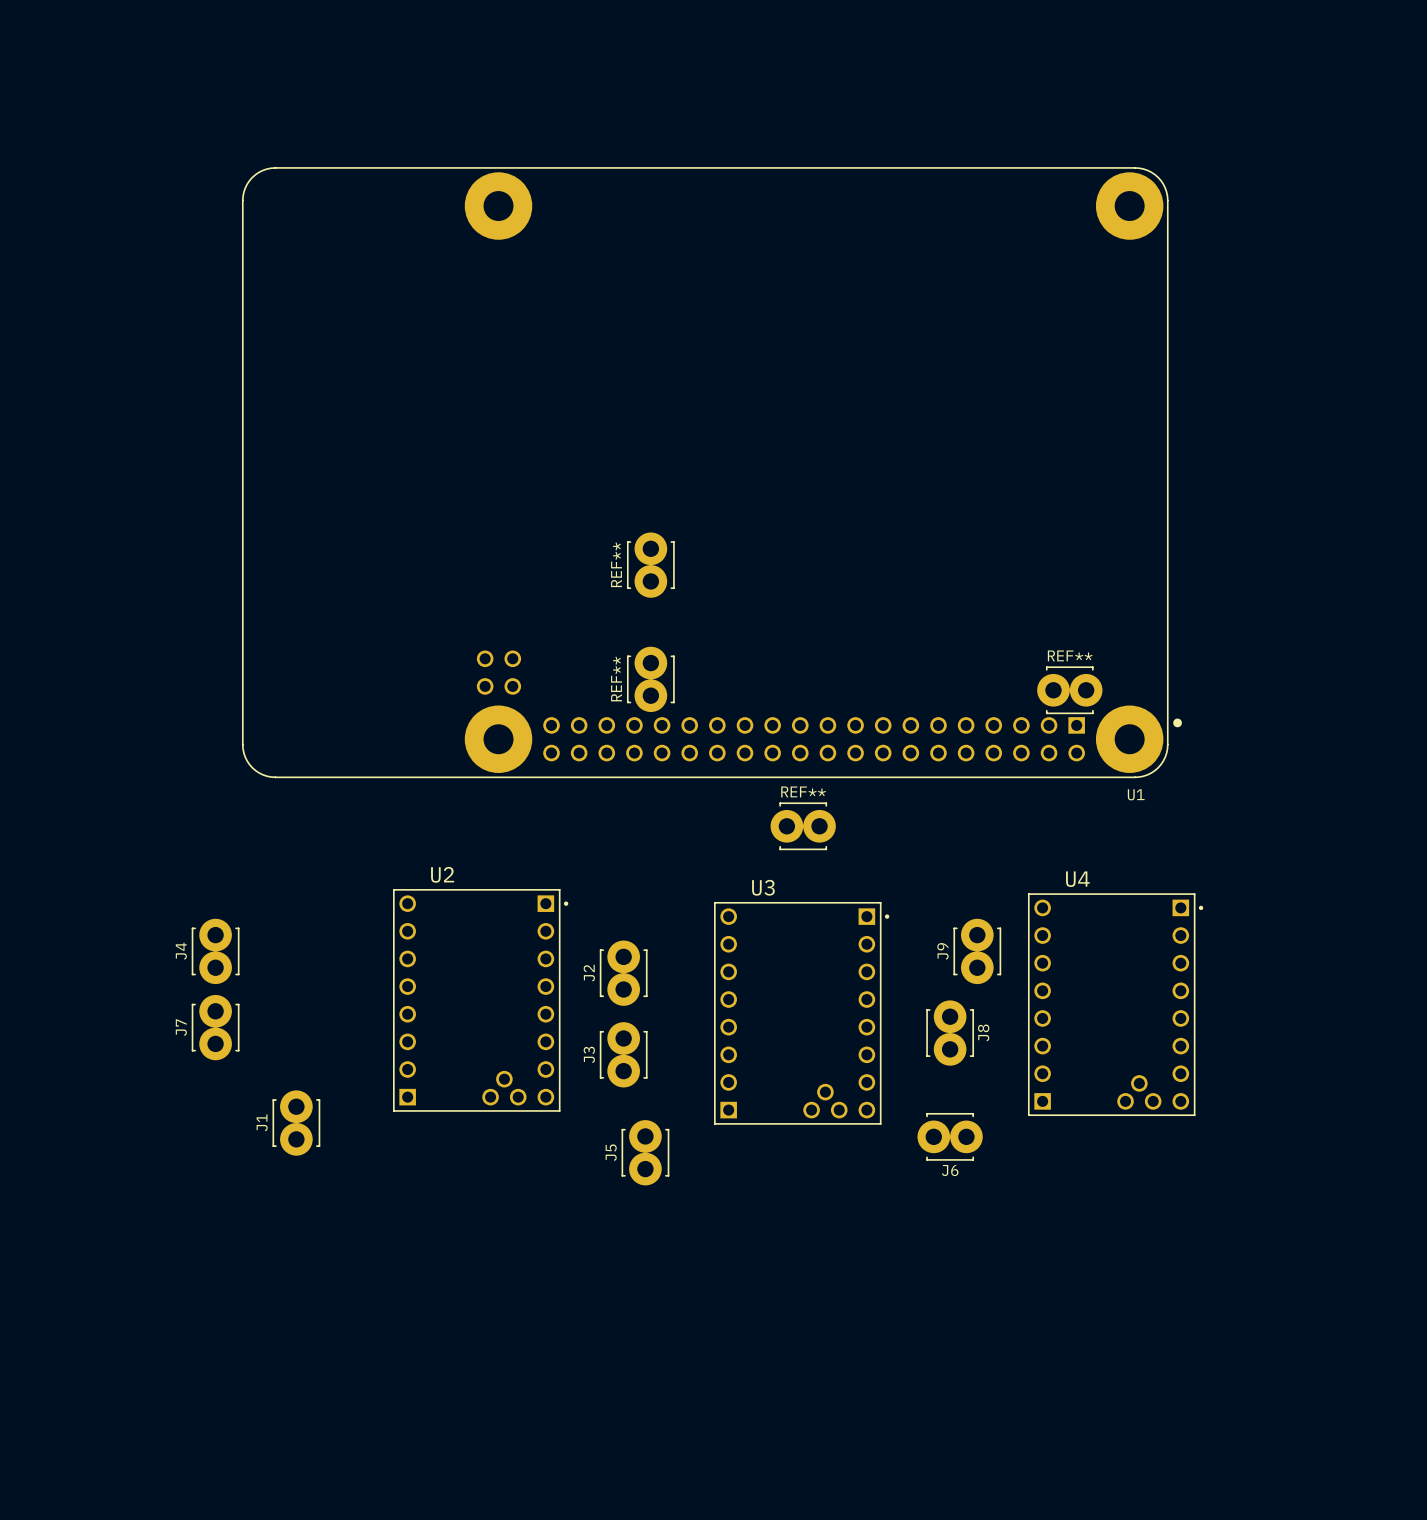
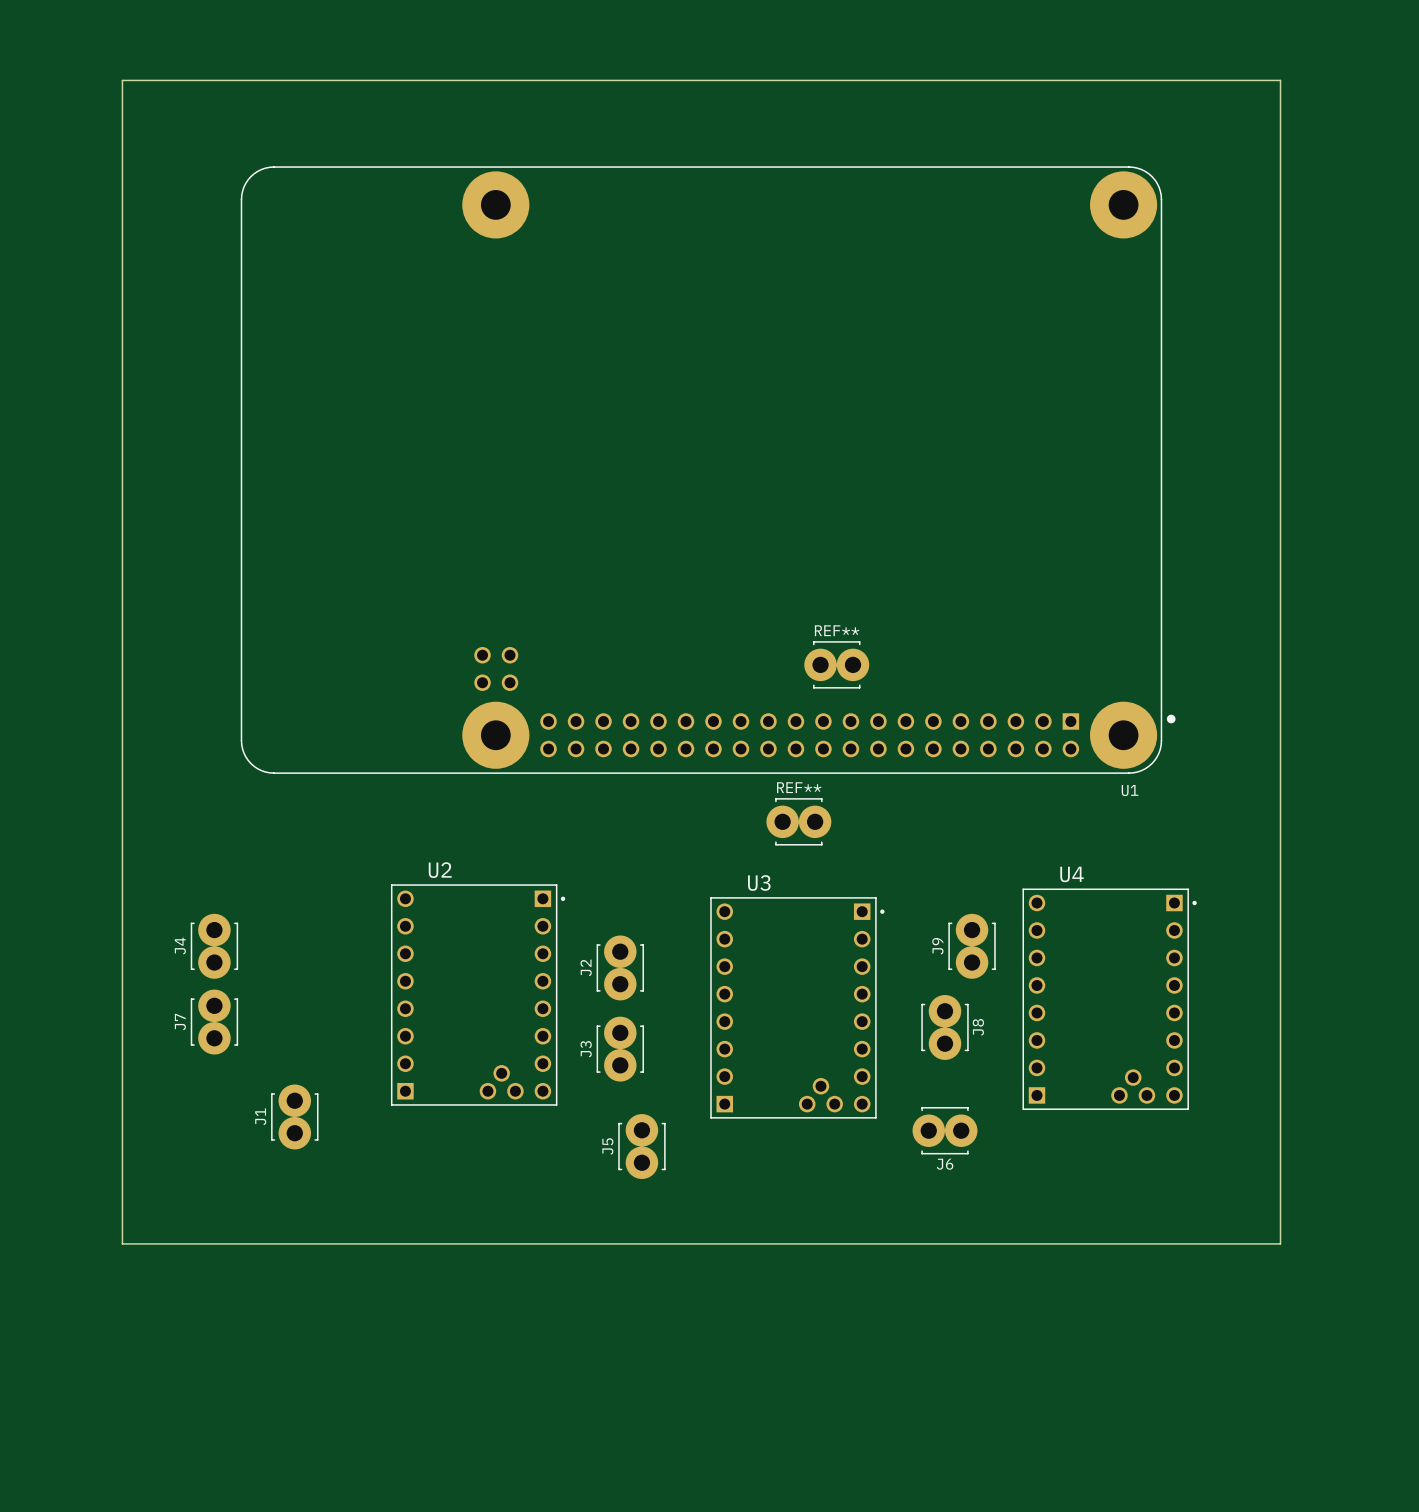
board edge: none -> (122, 80) (122, 1243) (1280, 1243) (1280, 80) (122, 80)
REF**: (650, 565) -> none
REF**: none -> (836, 664)
REF**: (650, 679) -> none
REF**: (1069, 690) -> none

